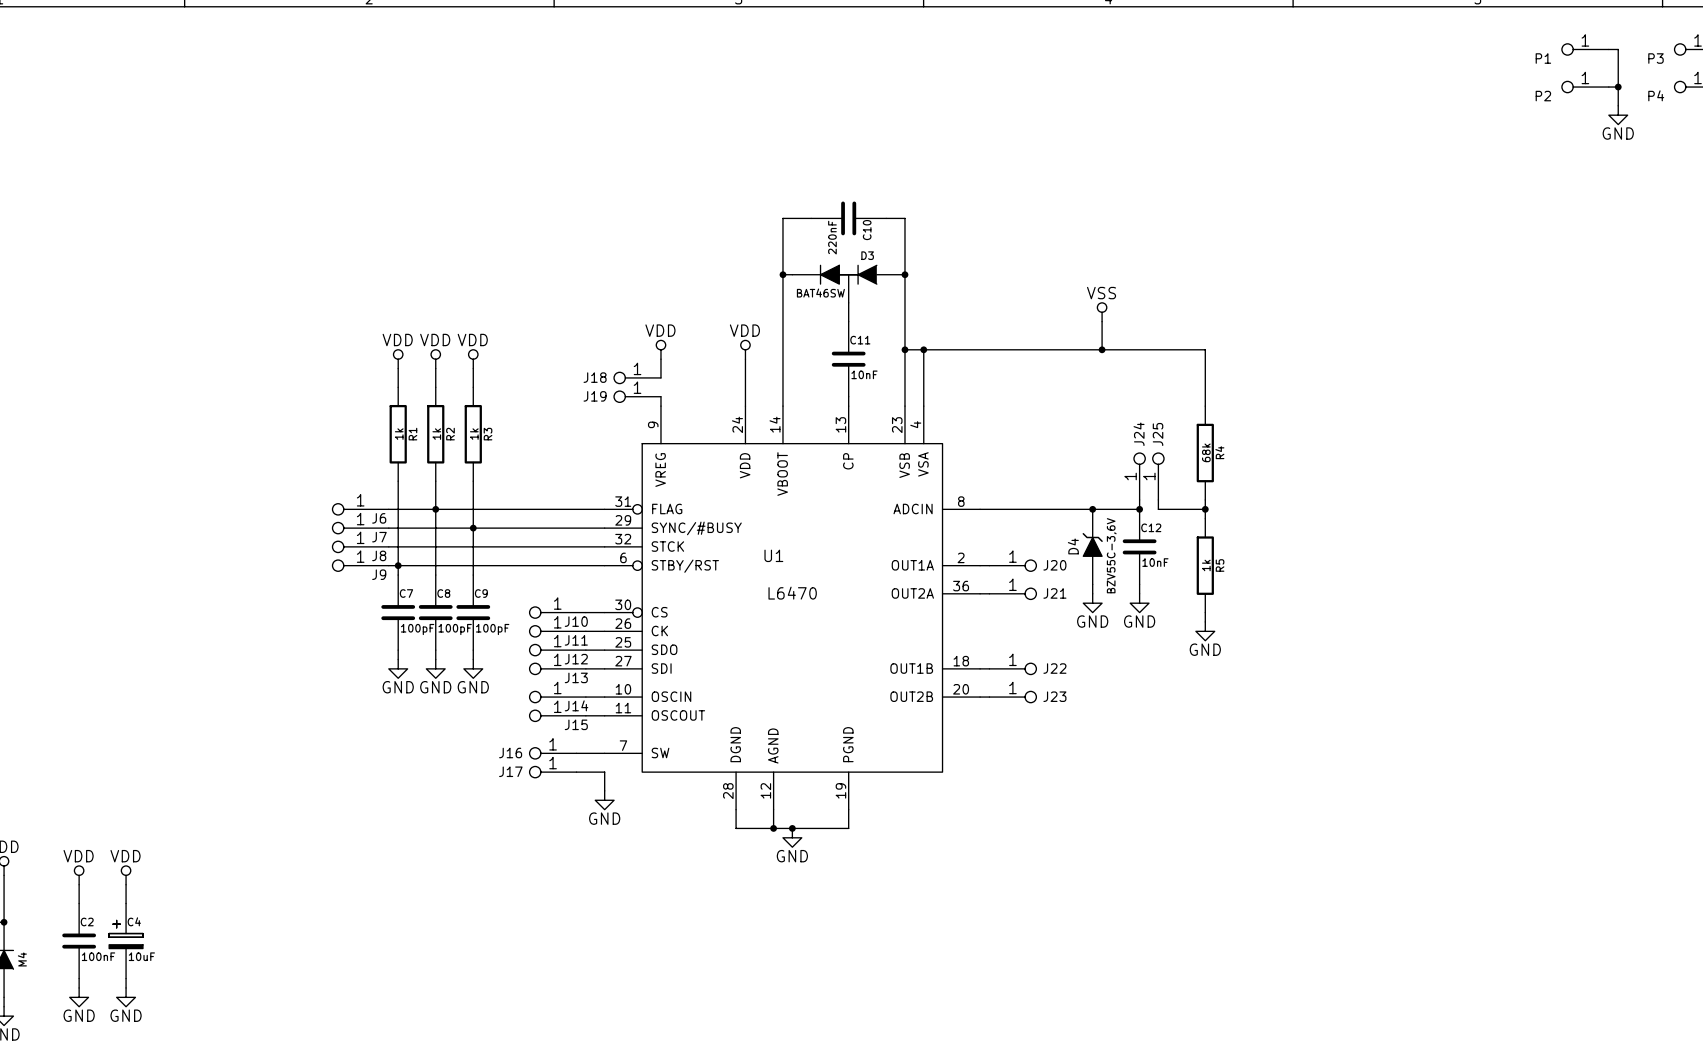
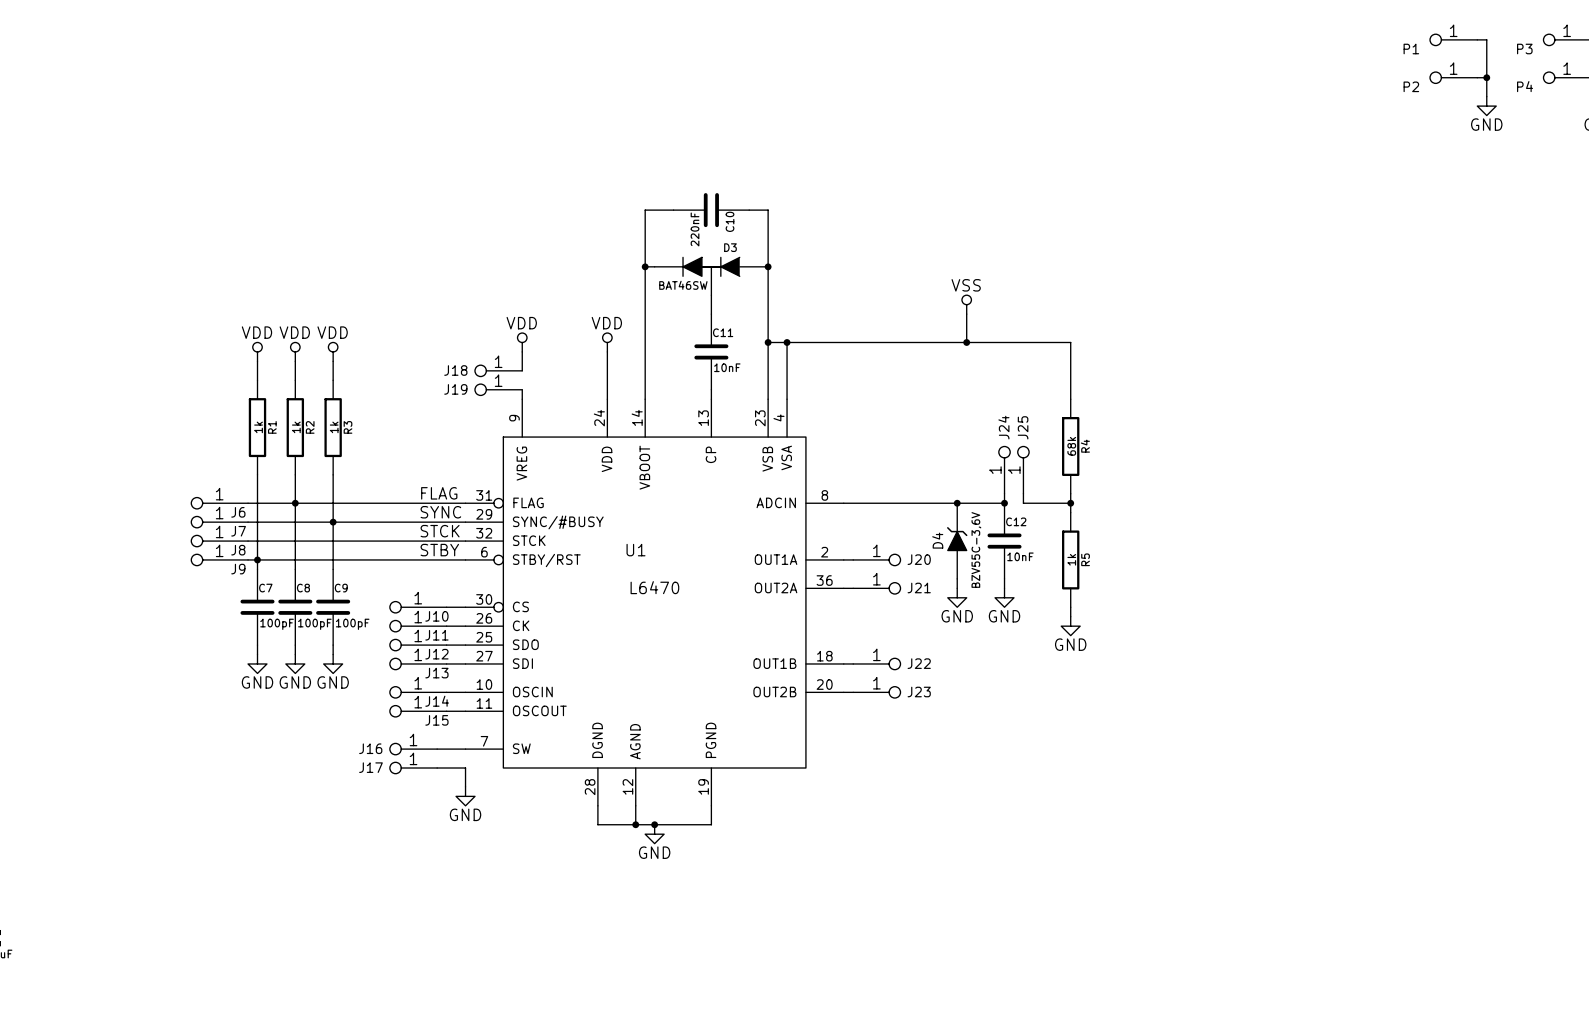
label: none -> FLAG (439, 493)
label: none -> SYNC (440, 512)
label: none -> STCK (440, 531)
label: none -> STBY (439, 550)

